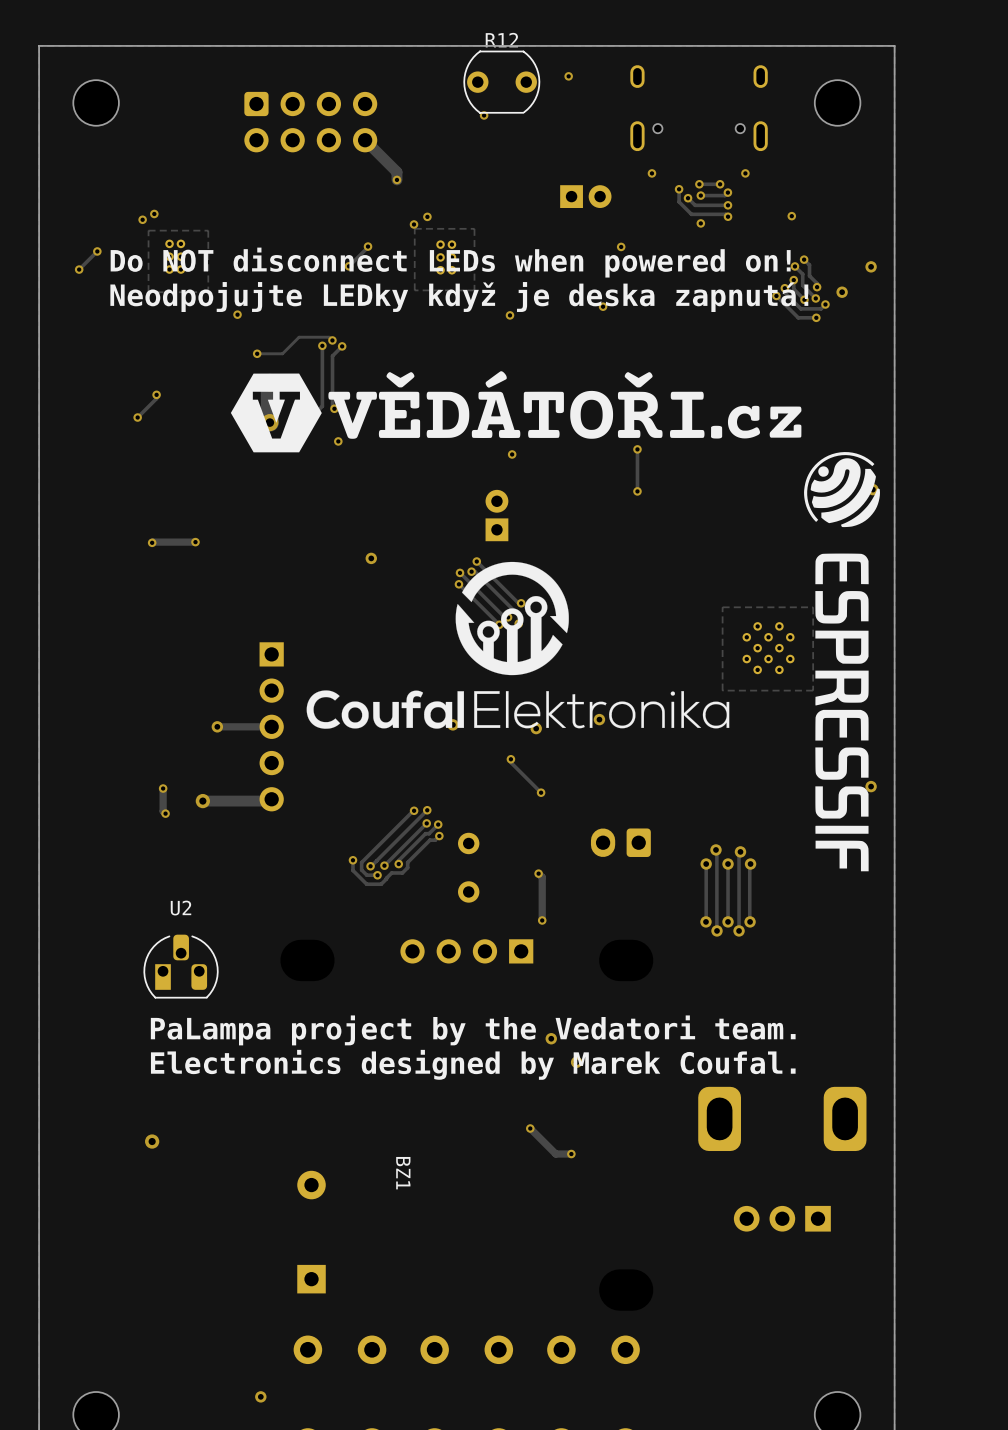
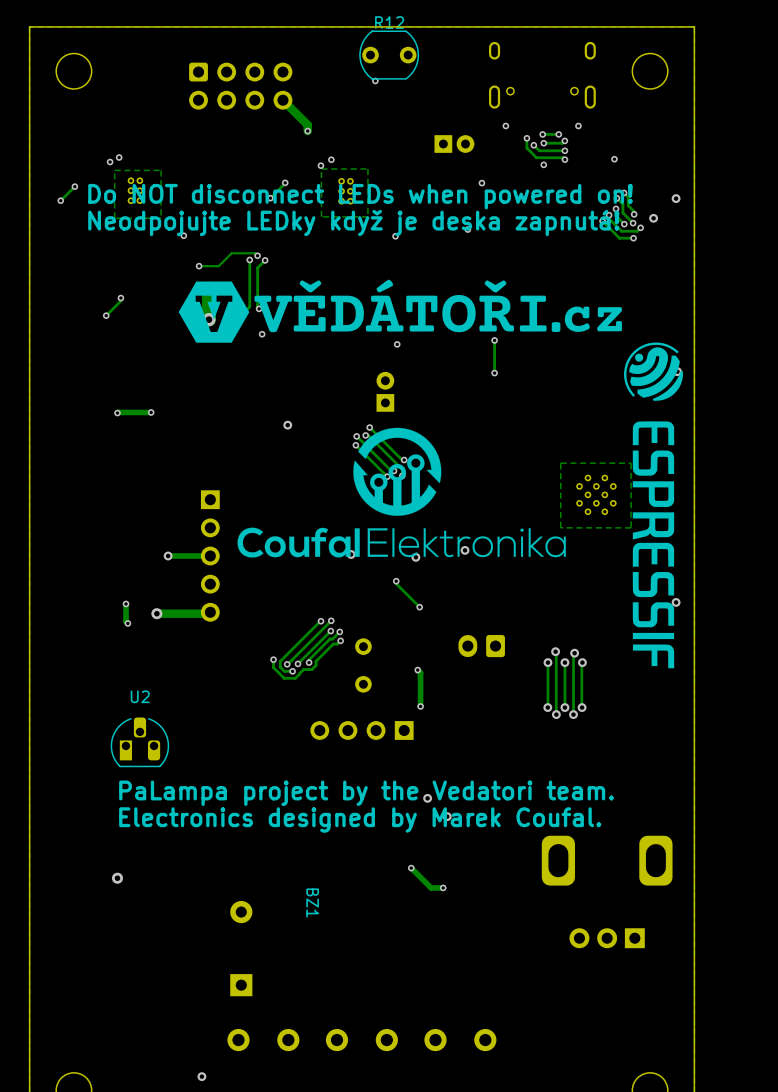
via: (568, 76) -> none

